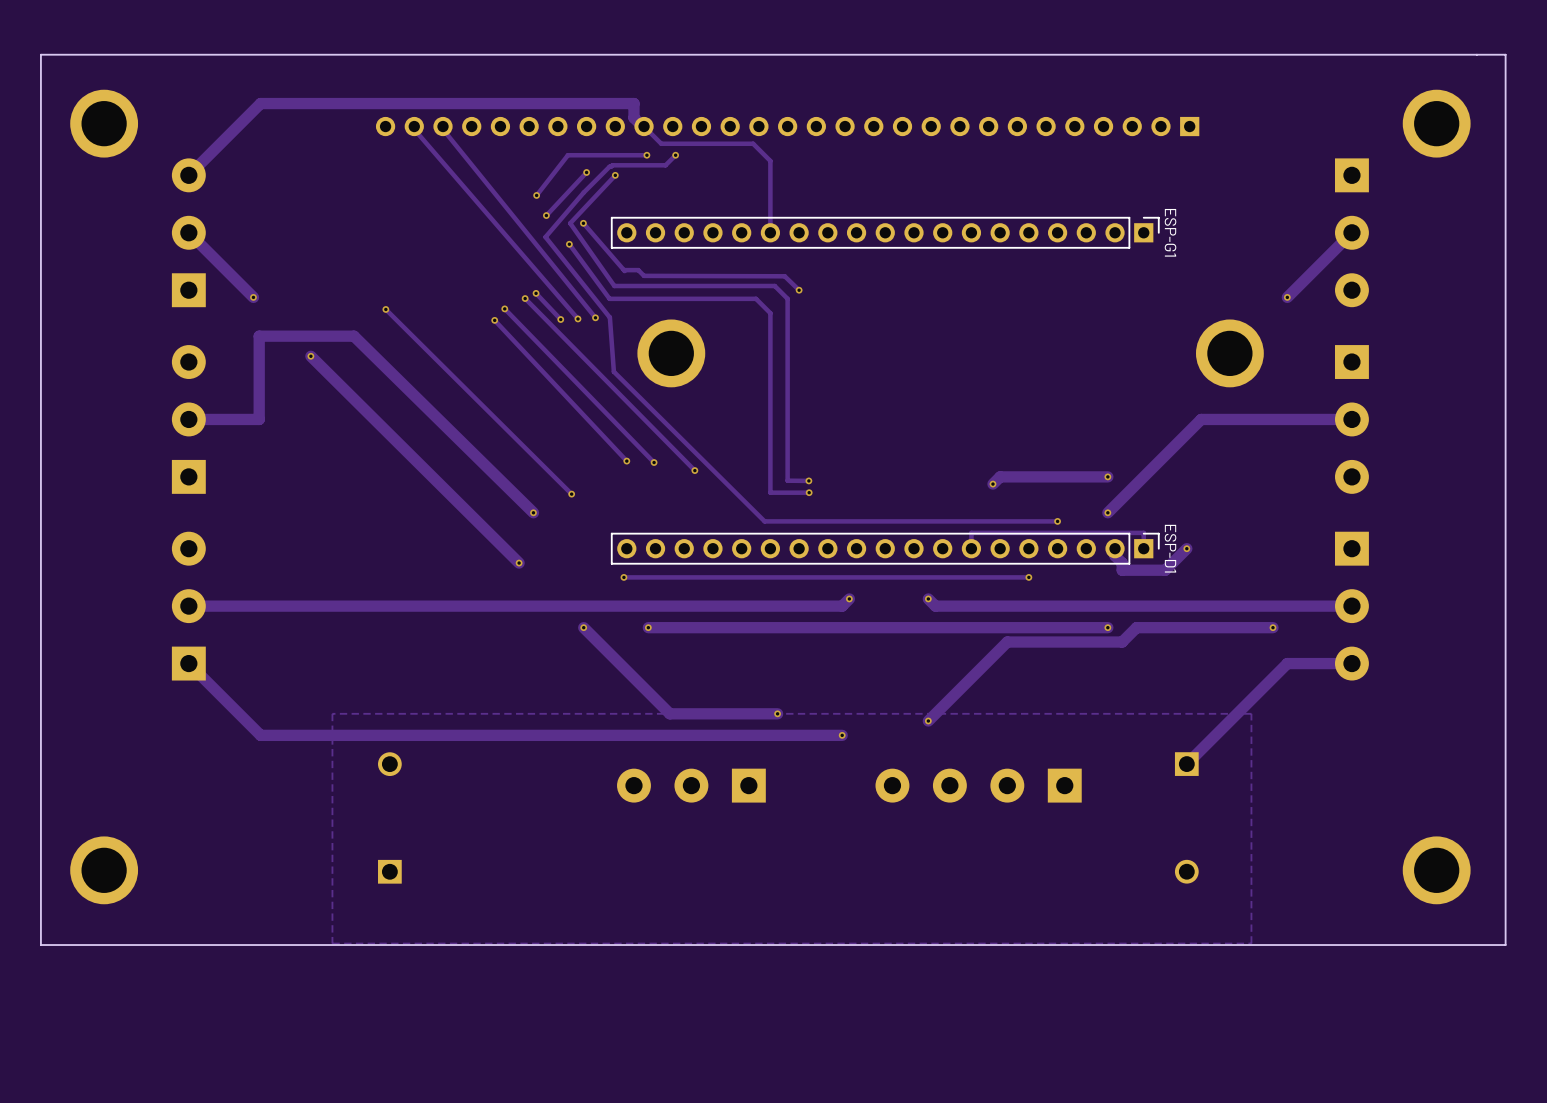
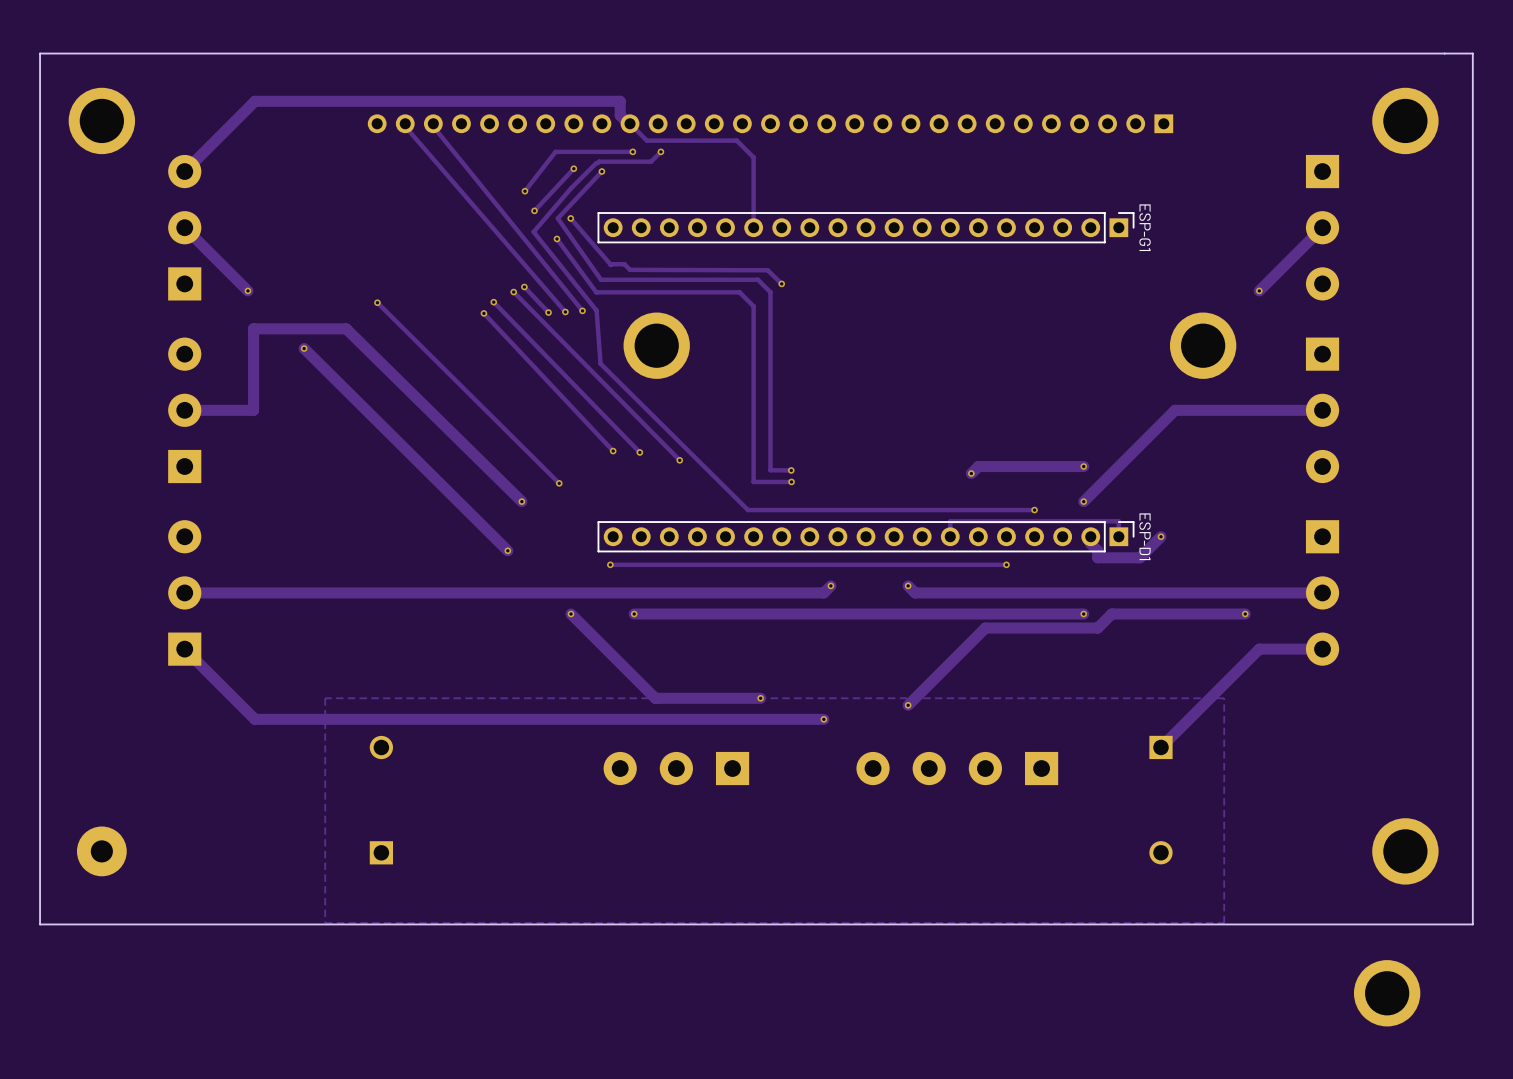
part footprint: [70, 836, 139, 905] -> [76, 826, 127, 877]
part: none -> (1387, 993)

